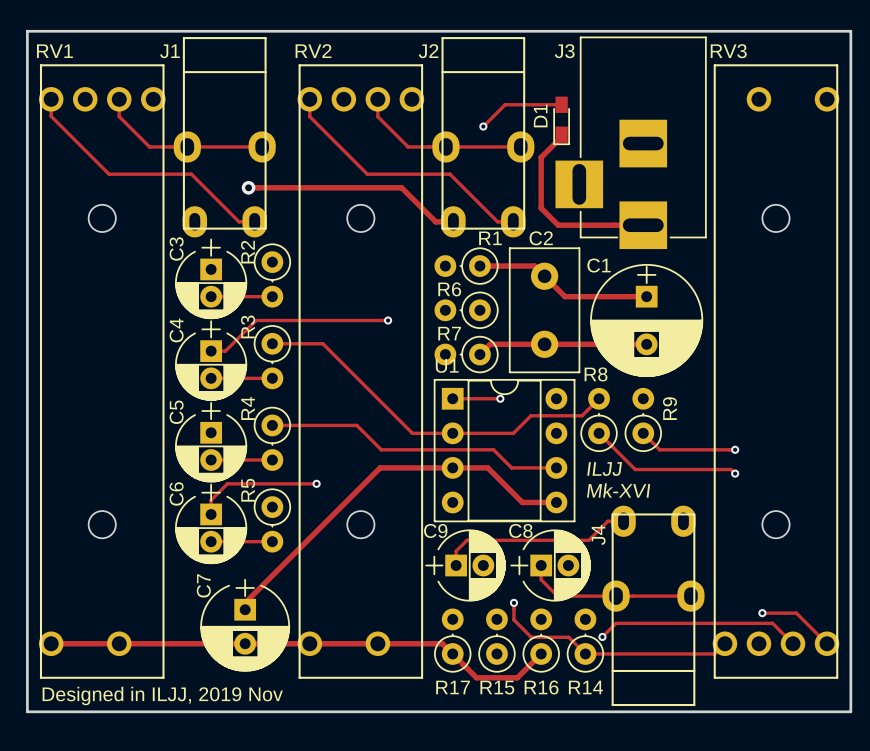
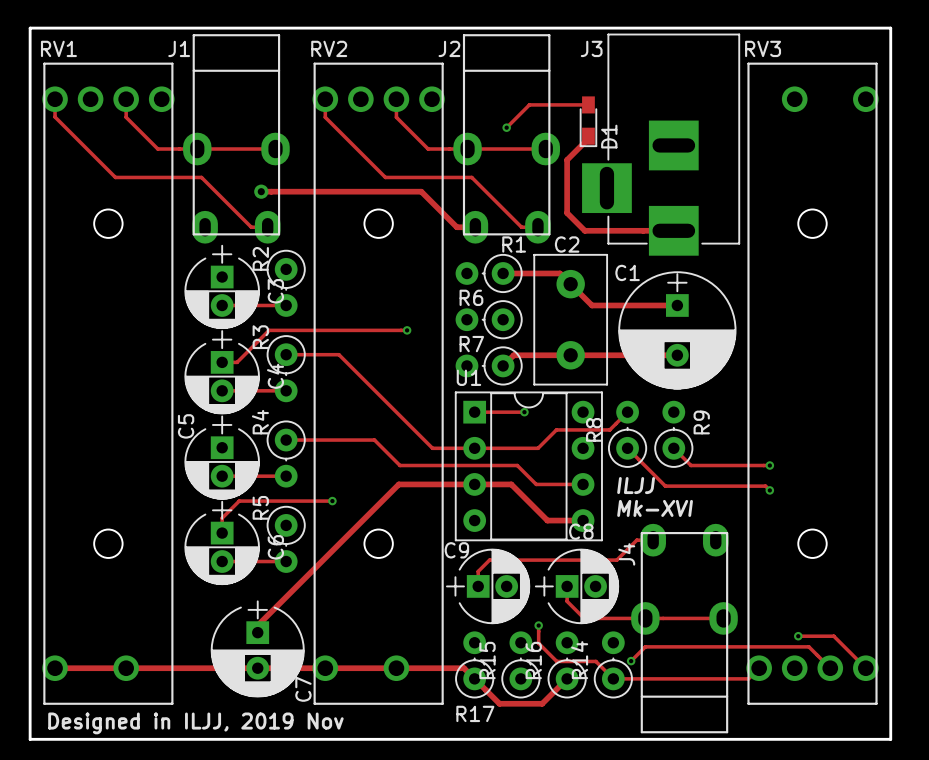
D1 name position: D1 (540, 116) -> D1 (609, 136)
C3 name position: C3 (176, 248) -> C3 (275, 291)
C4 name position: C4 (176, 330) -> C4 (275, 376)
R8 name rotation: 0° (596, 374) -> 90° counterclockwise (594, 429)
R8 name position: R8 (596, 374) -> R8 (594, 429)
C6 name position: C6 (176, 493) -> C6 (275, 547)
C8 name position: C8 (520, 530) -> C8 (581, 531)
C7 name position: C7 (203, 585) -> C7 (303, 689)
R15 name rotation: 0° (497, 687) -> 90° counterclockwise (487, 660)
R15 name position: R15 (497, 687) -> R15 (487, 660)
R16 name rotation: 0° (541, 687) -> 90° counterclockwise (533, 660)
R16 name position: R16 (541, 687) -> R16 (533, 660)
R14 name rotation: 0° (585, 687) -> 90° counterclockwise (579, 660)
R14 name position: R14 (585, 687) -> R14 (579, 660)

